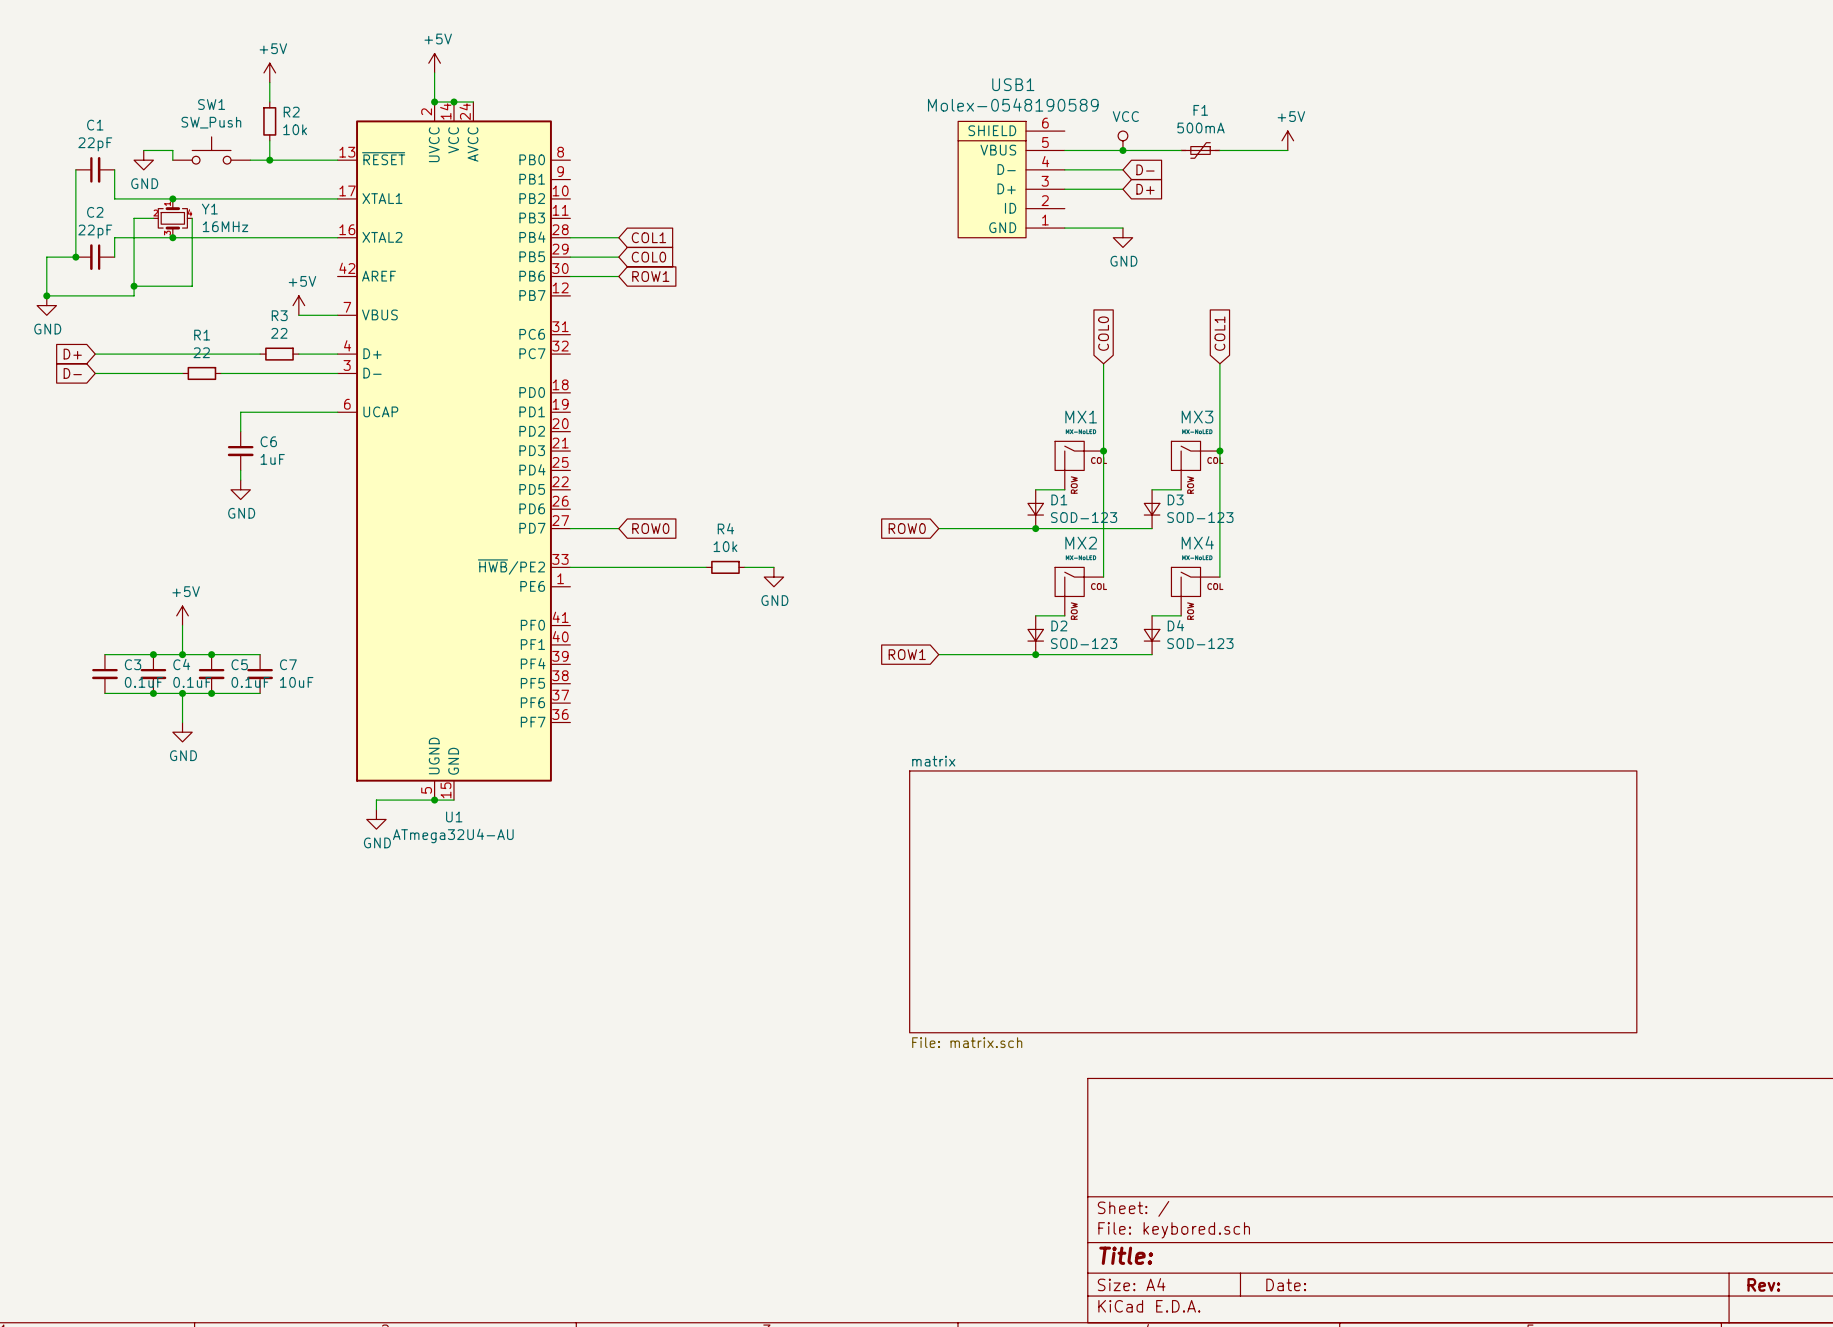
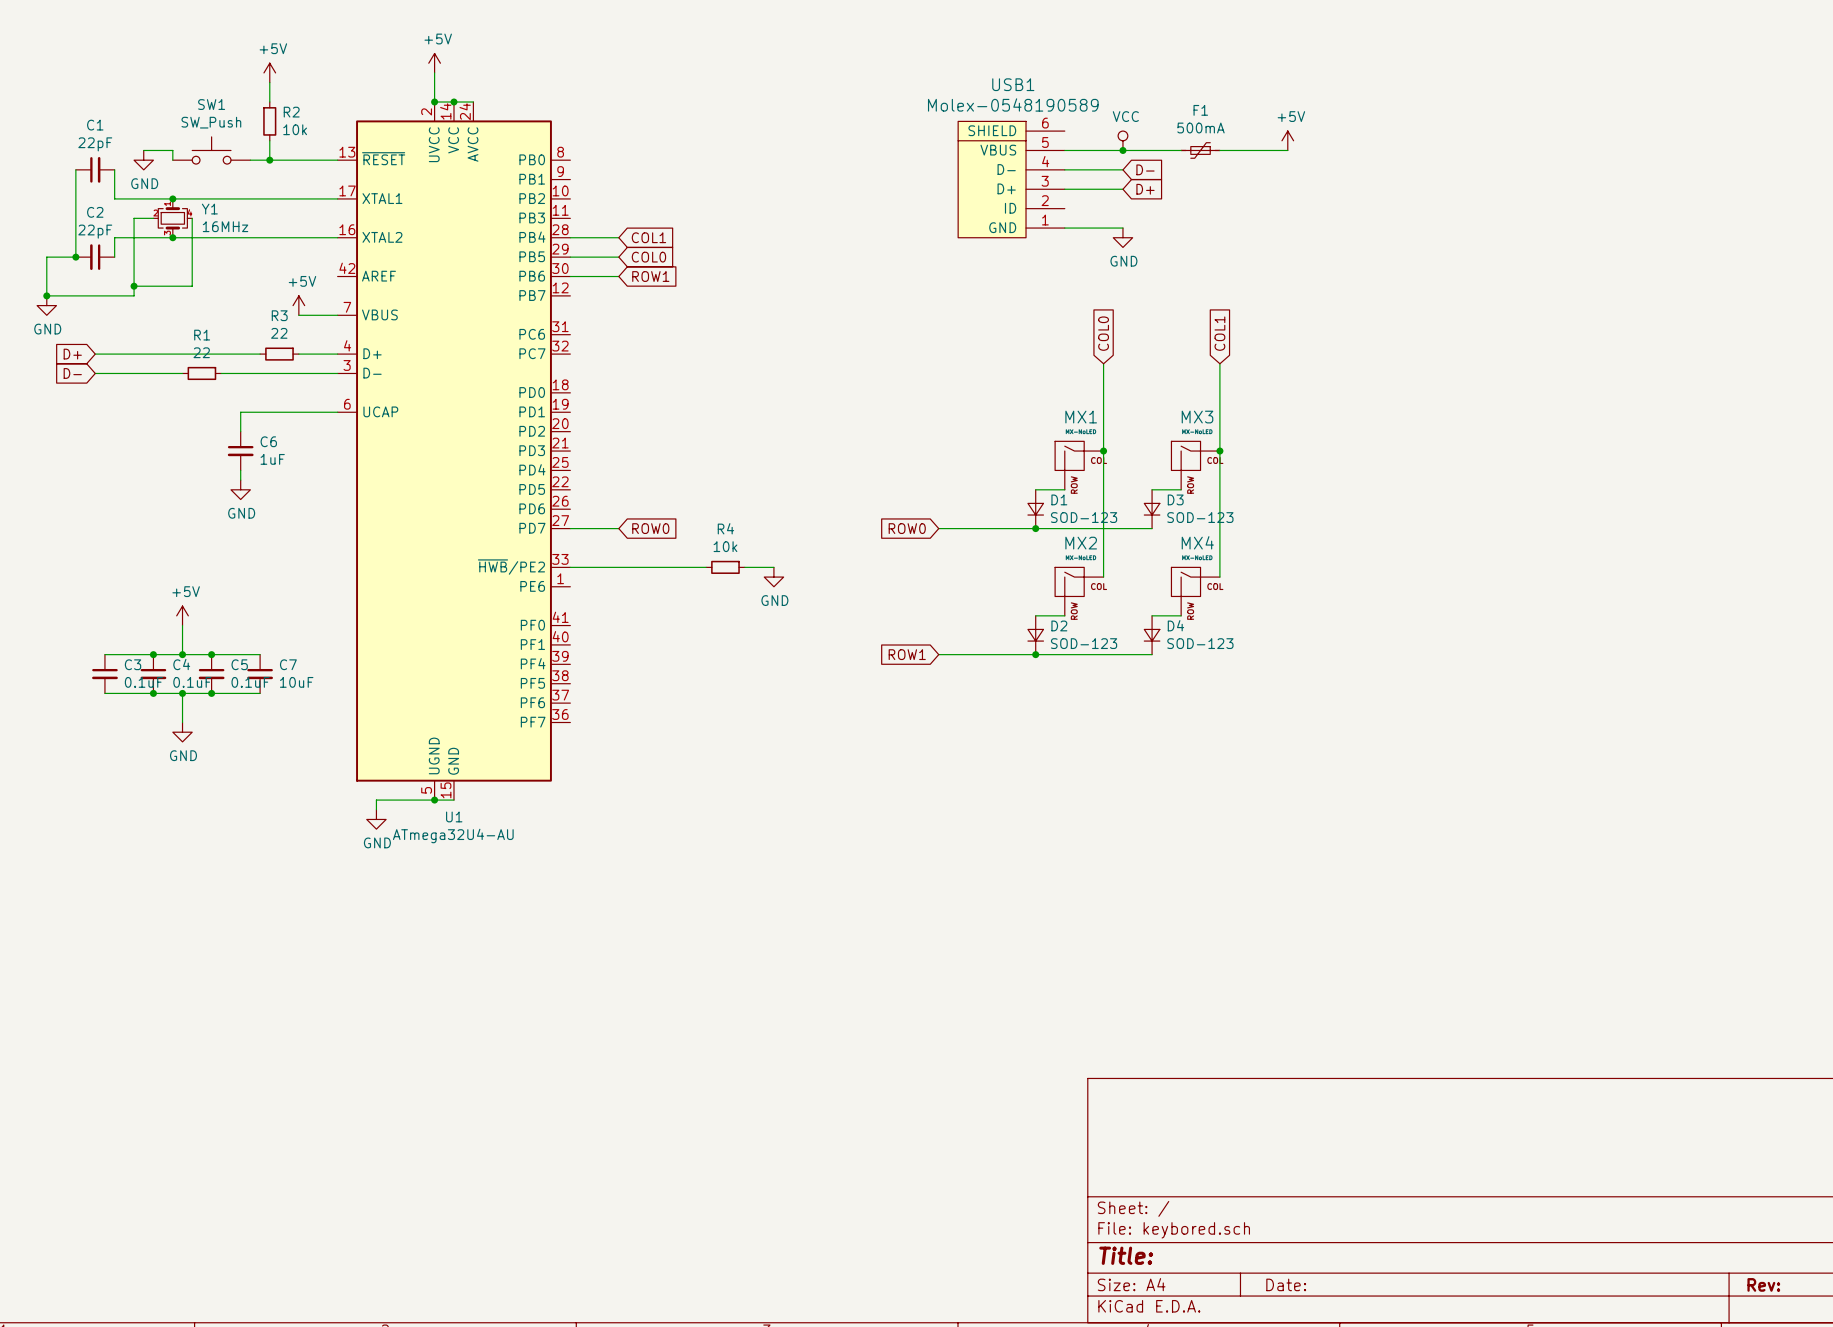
sheet matrix: File: matrix.sch (1273, 901) -> none

